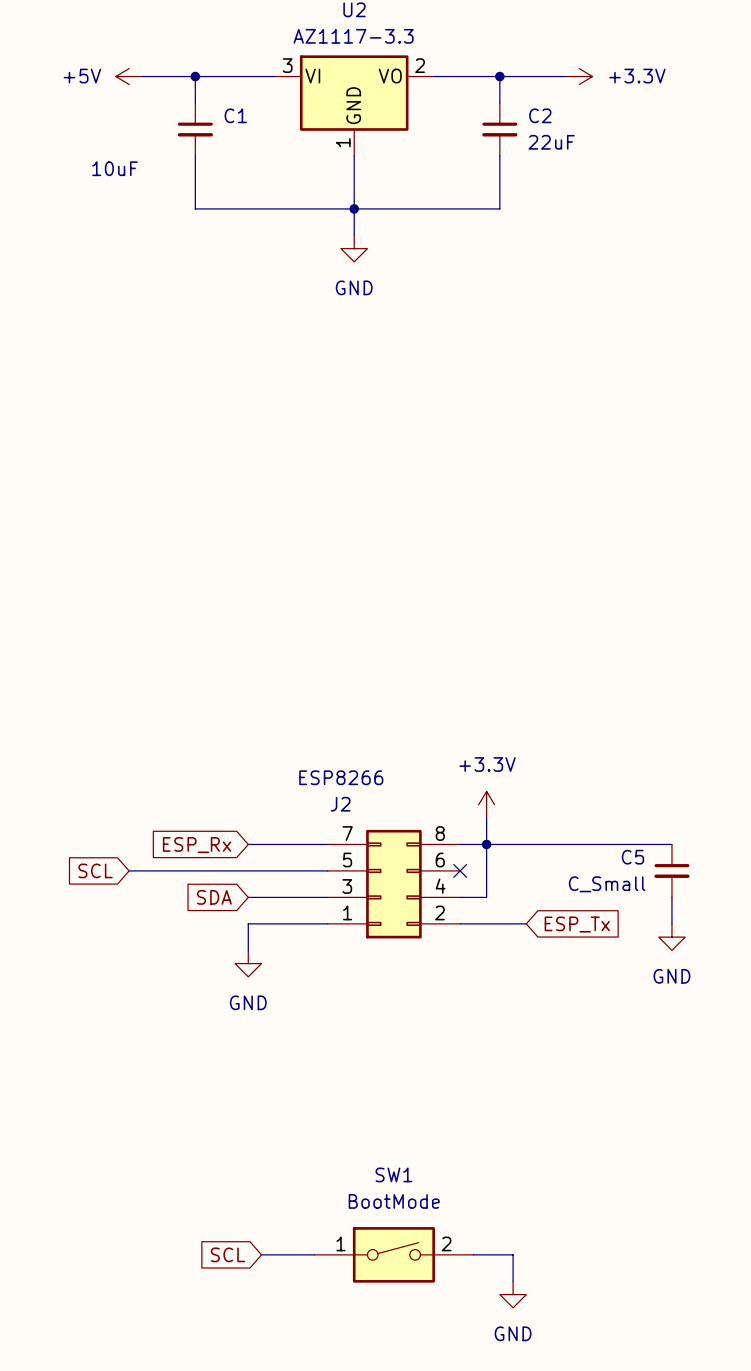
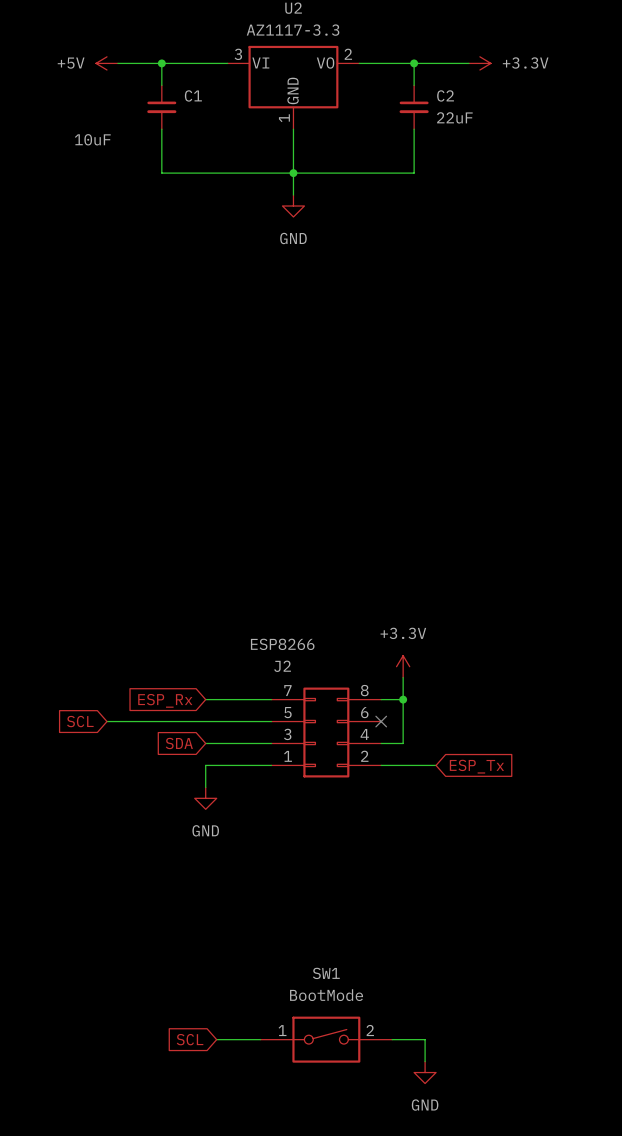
wire: (486, 844) (671, 844) -> none
C5: C_Small (671, 870) -> none
wire: (671, 897) (671, 923) -> none
power symbol: GND (671, 937) -> none

